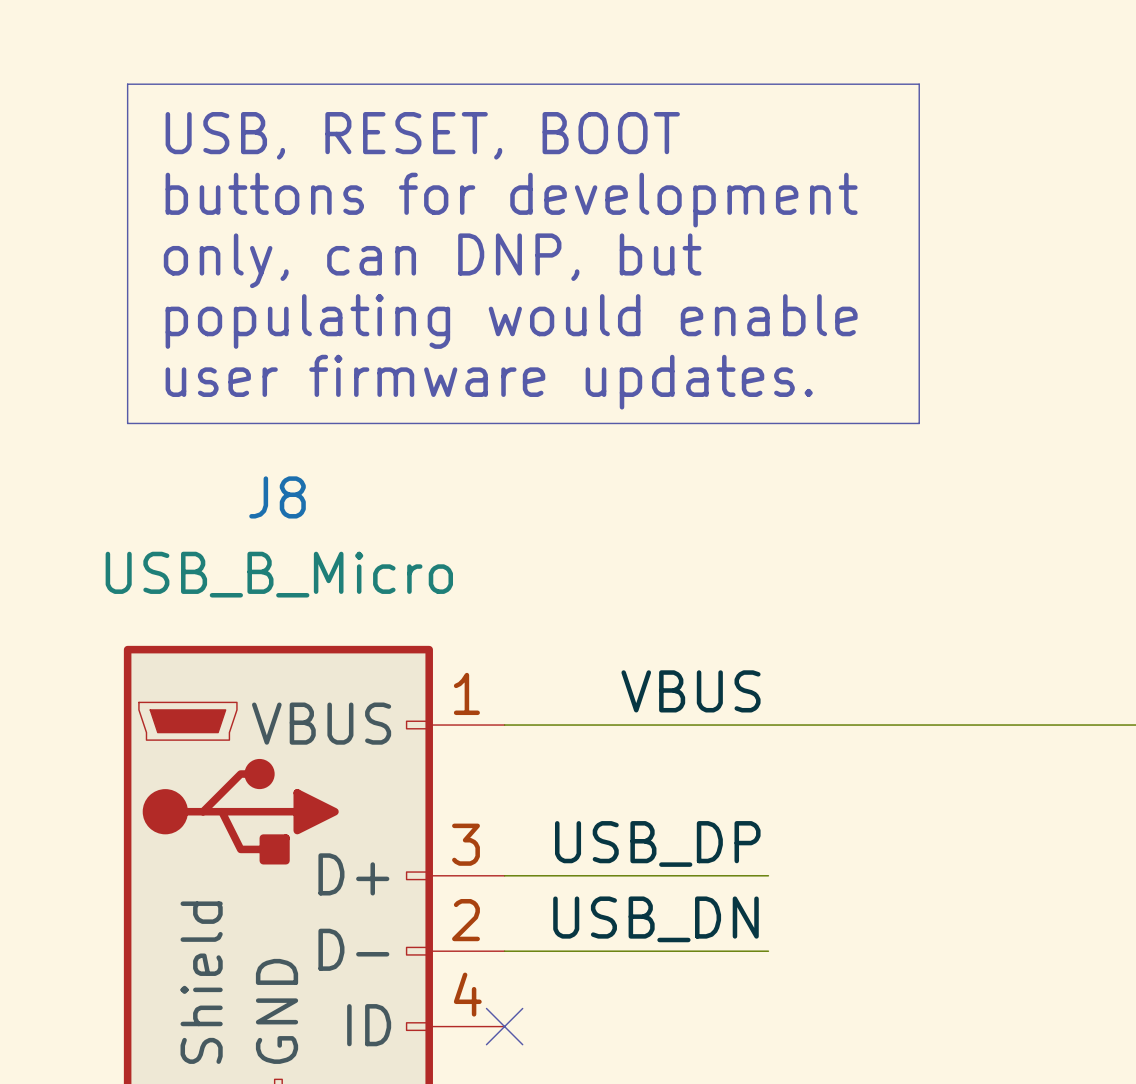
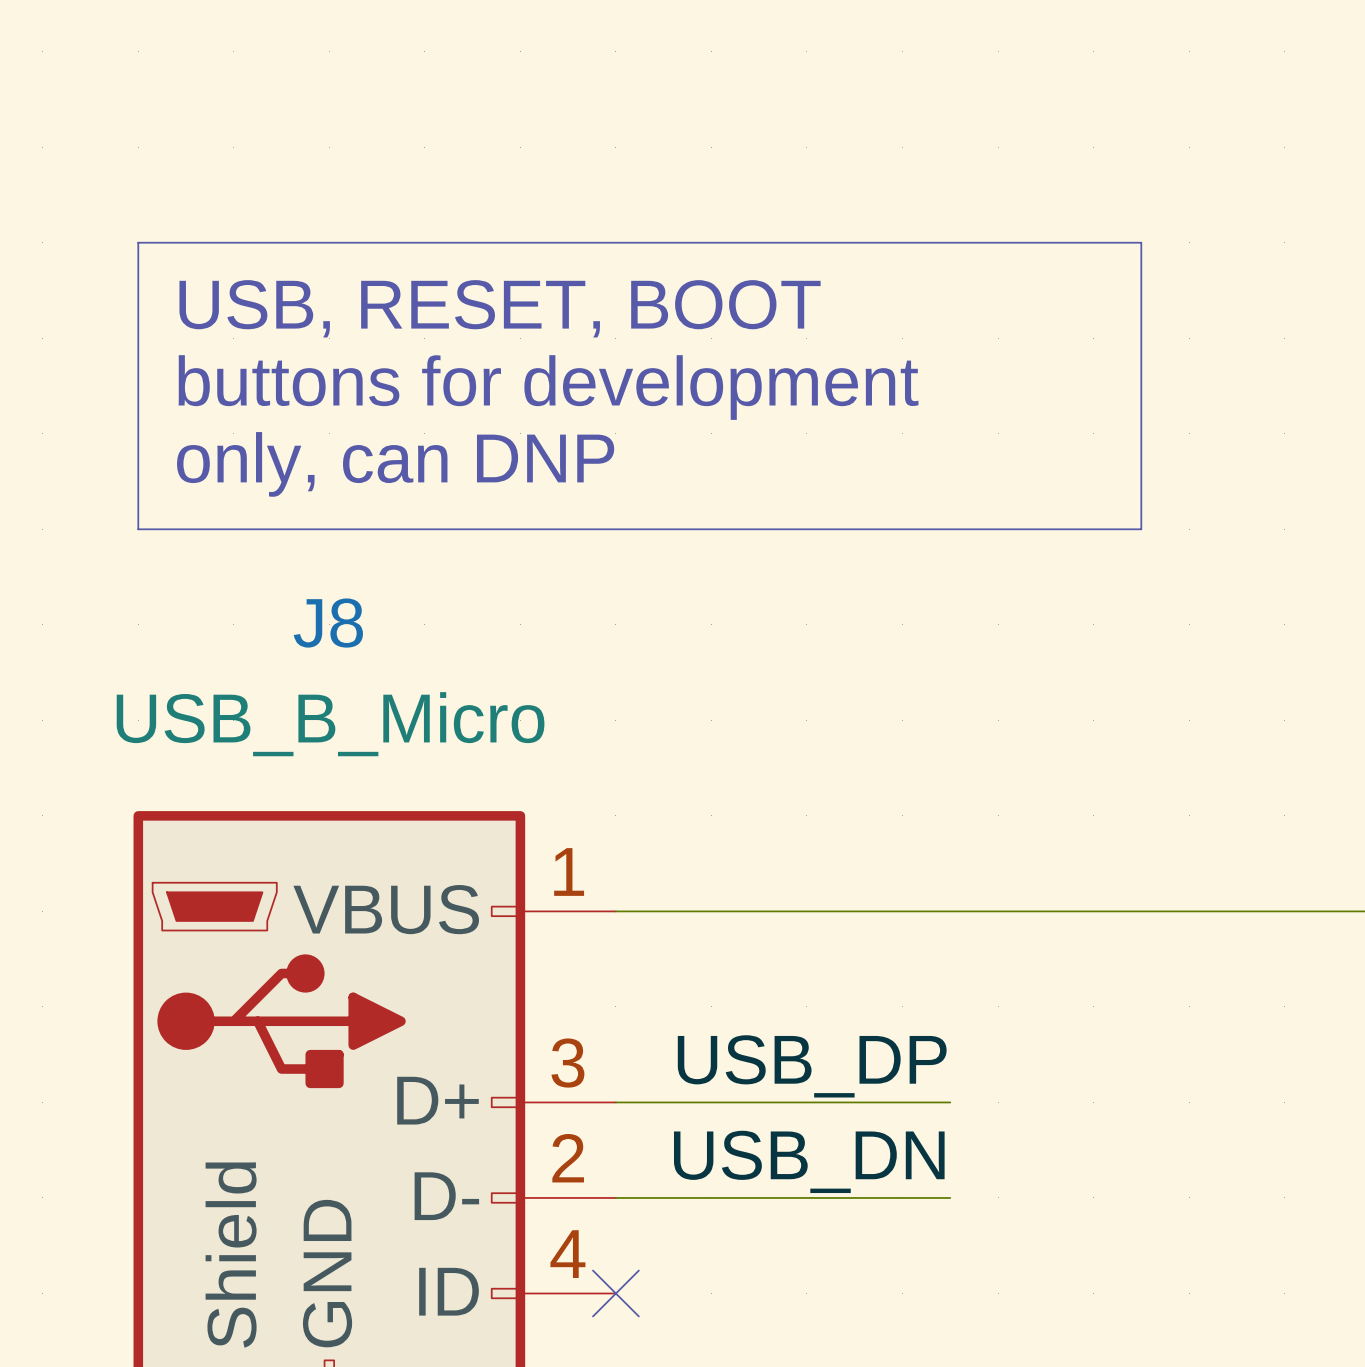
text position: USB, RESET, BOOT (422, 135) -> USB, RESET, BOOT (500, 308)
line: (127, 197) (127, 84) (919, 84) (919, 197) -> (138, 242) (1141, 242)
text position: buttons for development (511, 200) -> buttons for development (548, 387)
text: only, can DNP, but (432, 260) -> none
text: populating would enable (511, 321) -> none
text: user firmware updates. (489, 382) -> only, can DNP (395, 464)
label: VBUS (690, 691) -> none

